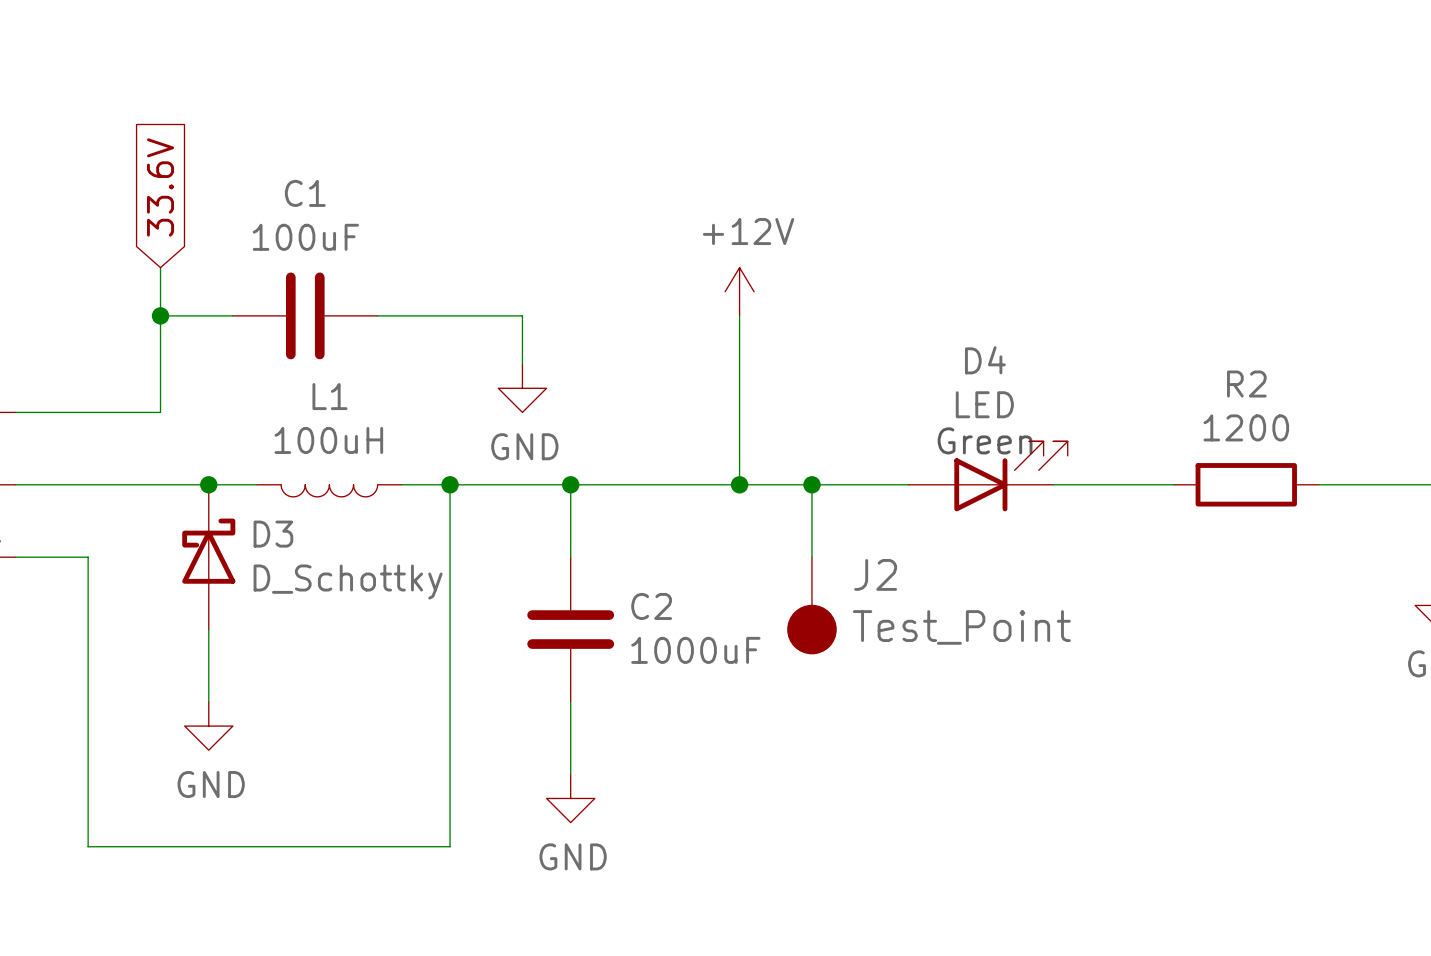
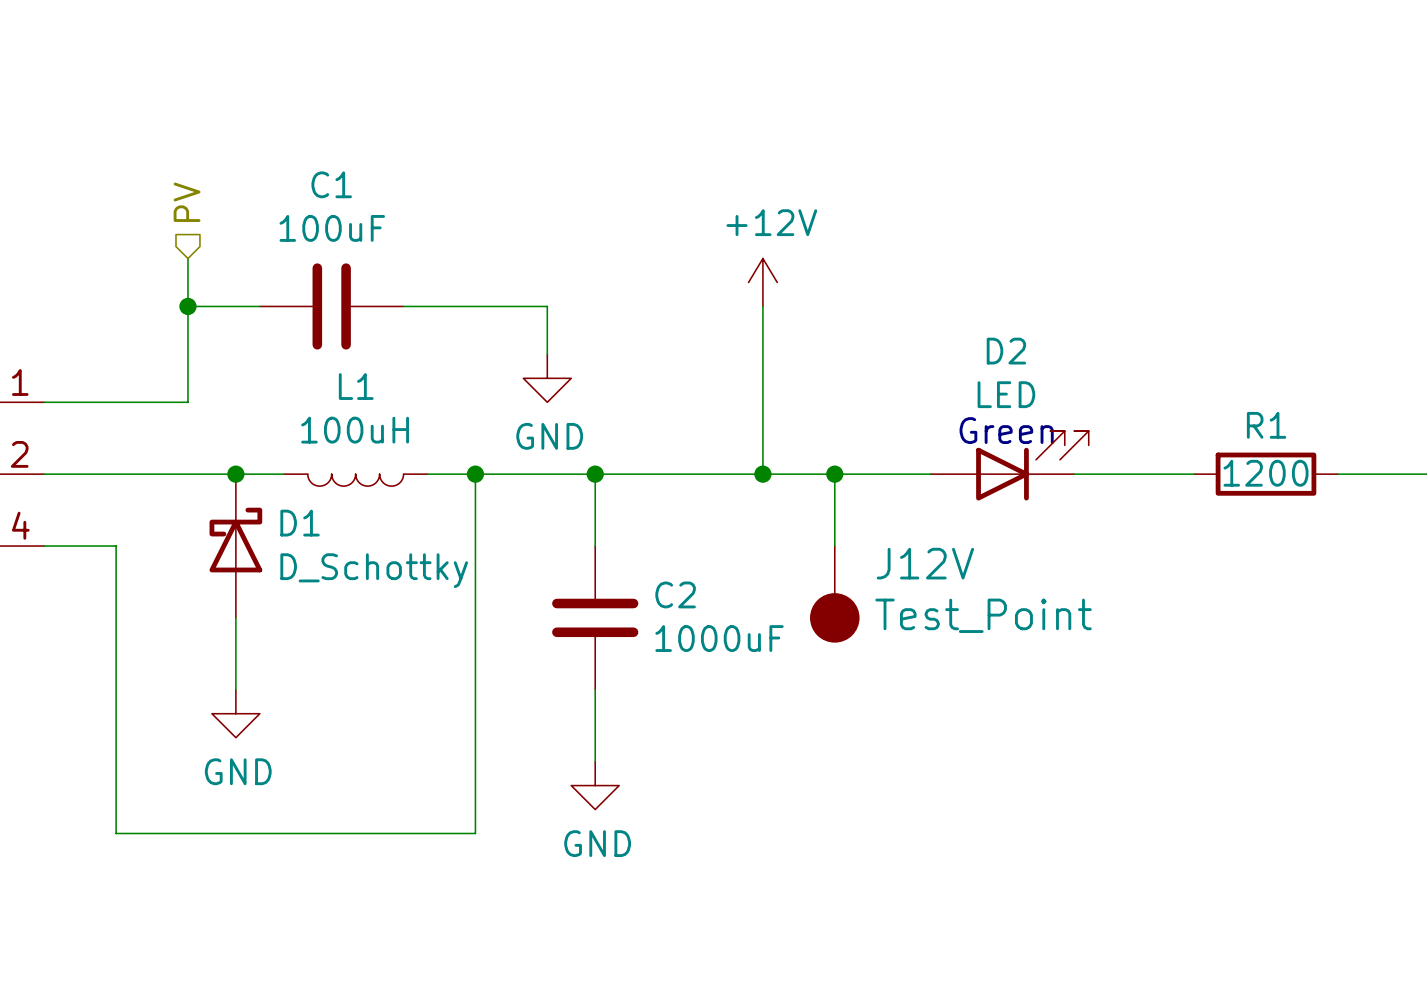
global label: 33.6V (160, 187) -> none
hierarchical label: none -> PV (187, 202)
D4 name: D4 (985, 360) -> D2 (1006, 351)
R2 name: R2 (1246, 384) -> R1 (1266, 425)
R2 value position: 1200 (1246, 427) -> 1200 (1266, 473)
D3 name: D3 (273, 534) -> D1 (300, 523)
J2 name: J2 (875, 574) -> J12V (925, 563)

